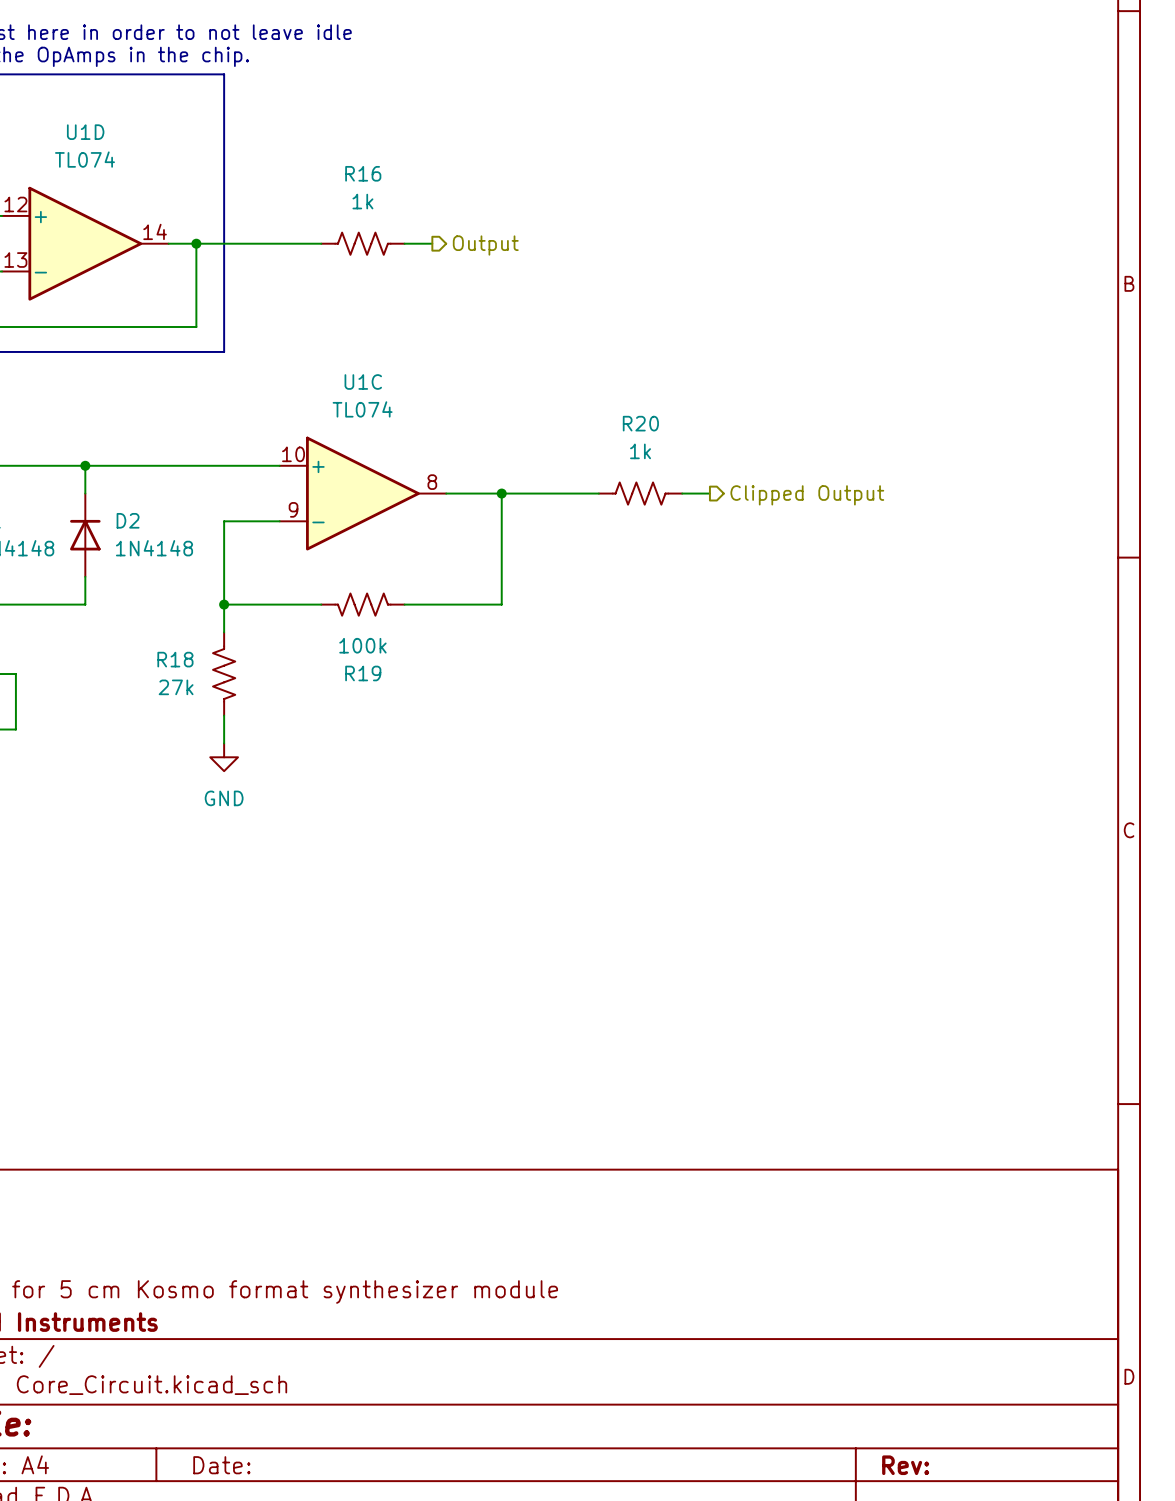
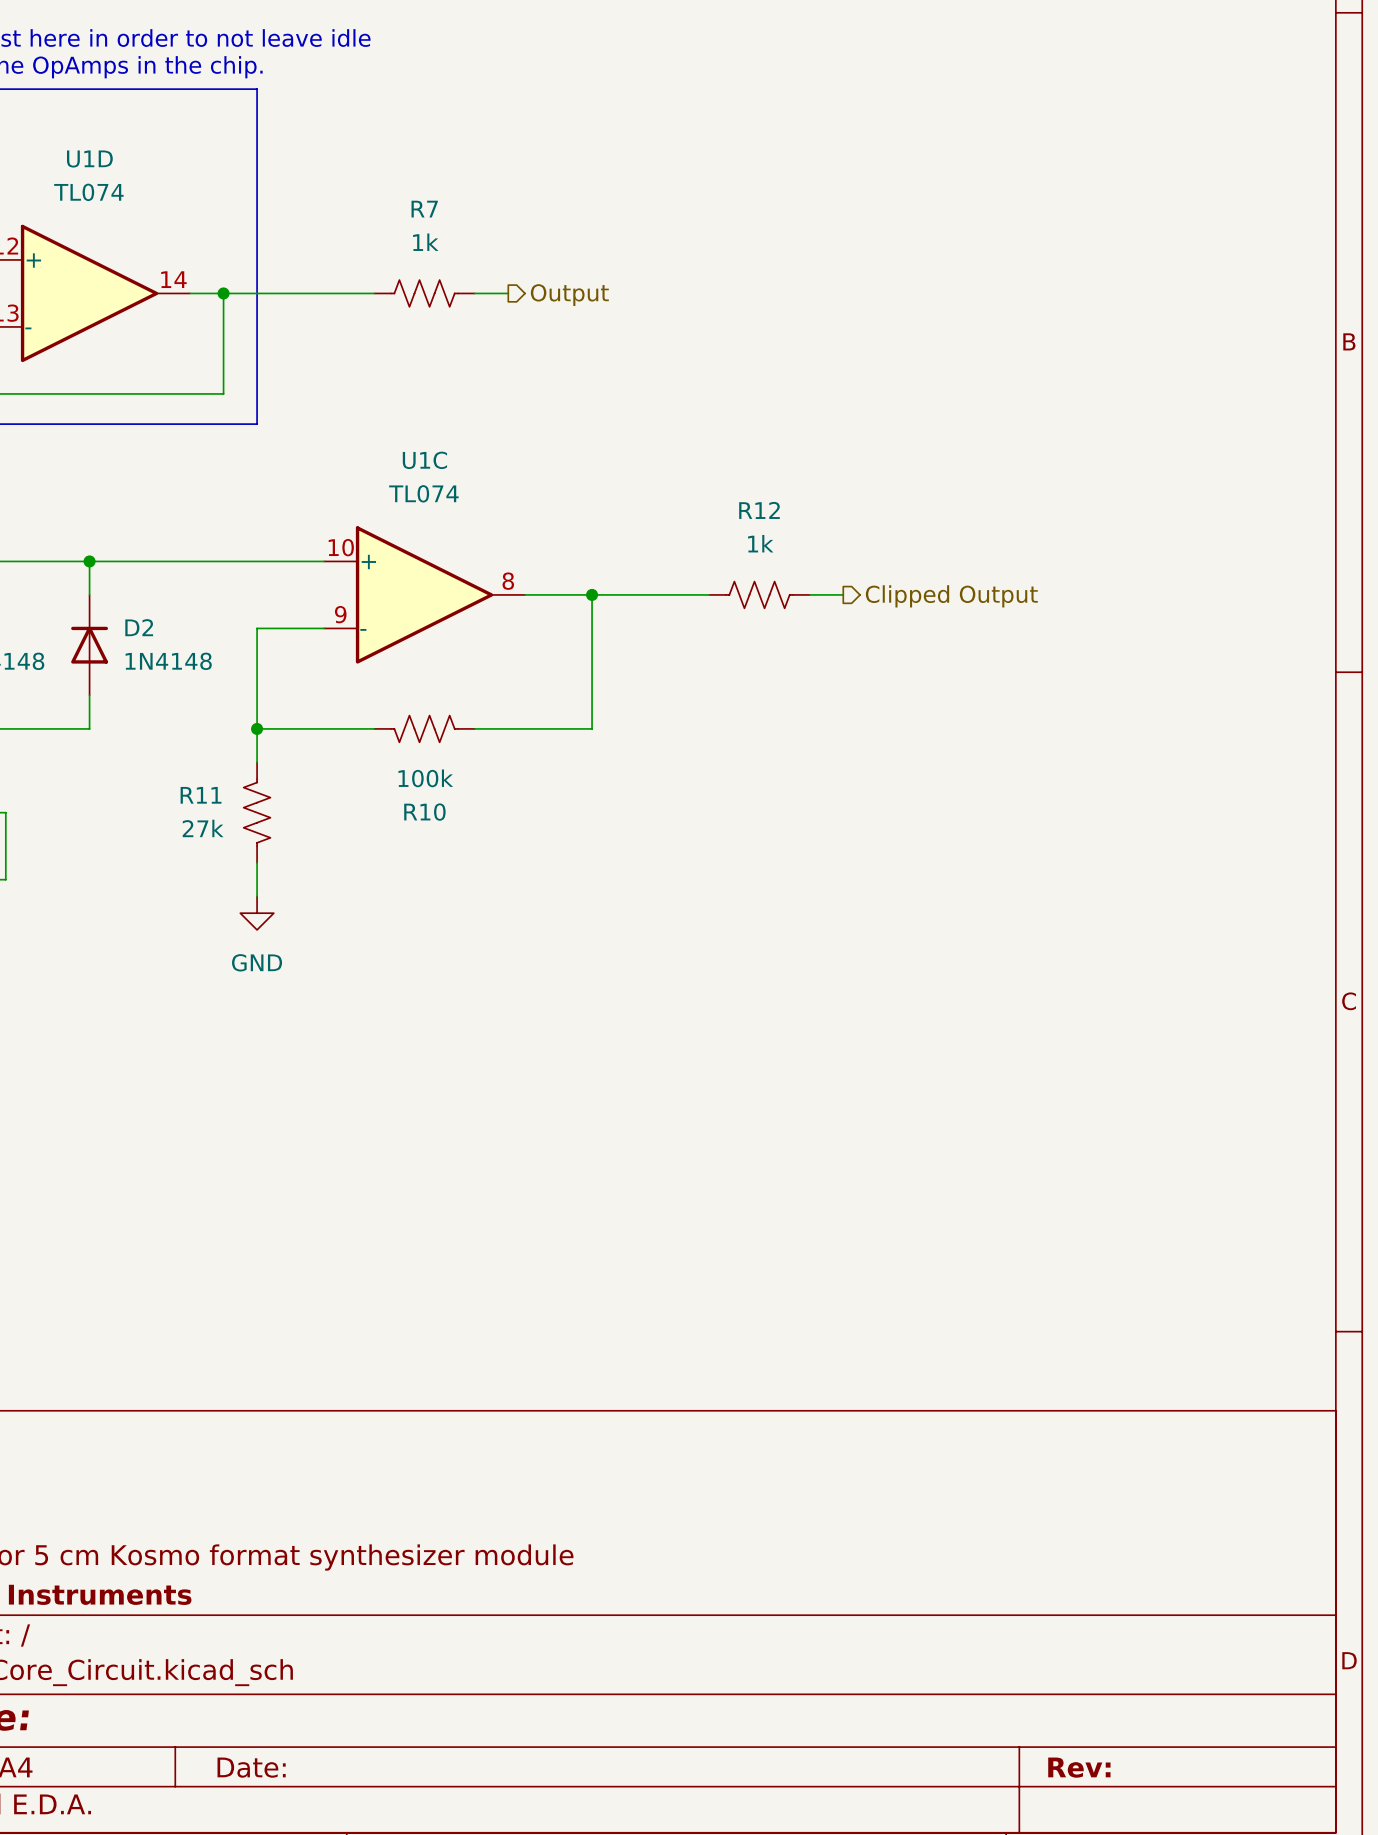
R16 name: R16 (363, 173) -> R7 (424, 209)
R20 name: R20 (640, 423) -> R12 (759, 510)
R18 name: R18 (175, 659) -> R11 (201, 795)
R19 name: R19 (363, 673) -> R10 (424, 812)

